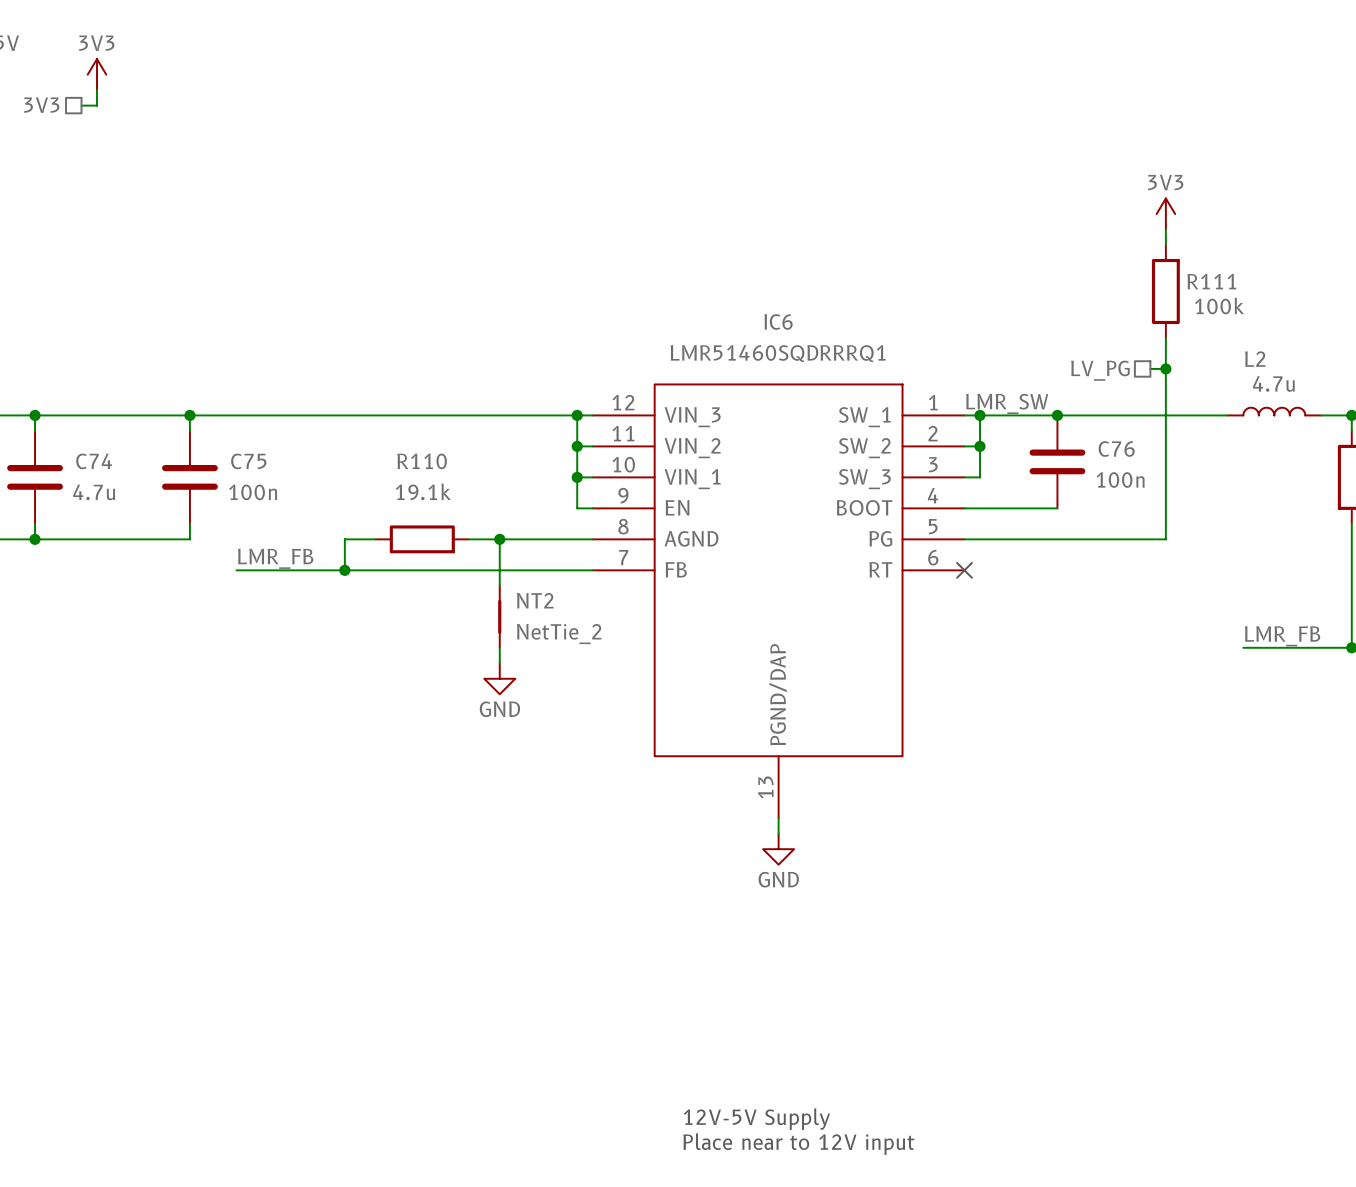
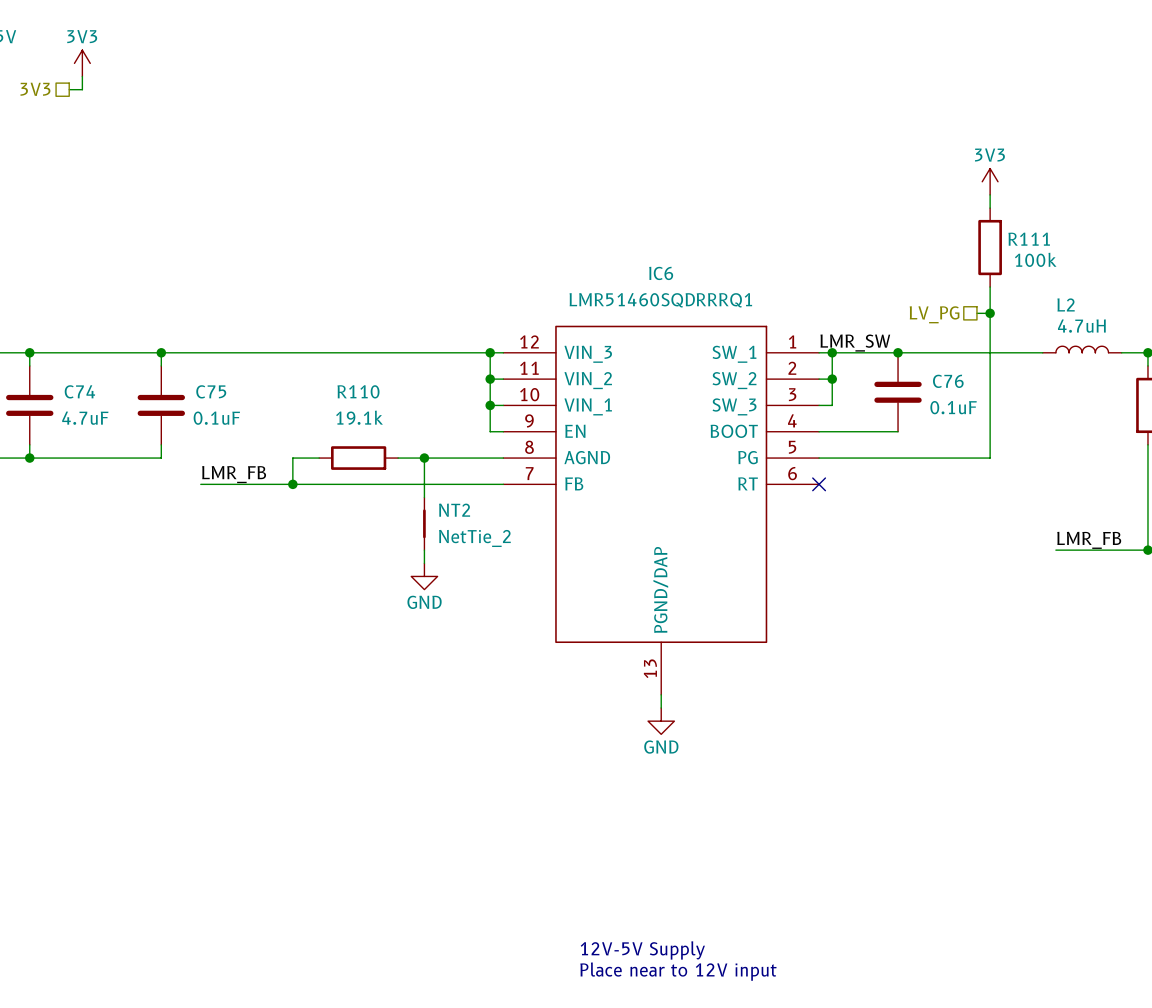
L2 value: 4.7u (1273, 383) -> 4.7uH (1081, 326)
C76 value: 100n (1120, 479) -> 0.1uF (953, 407)
C74 value: 4.7u (94, 492) -> 4.7uF (85, 418)
C75 value: 100n (253, 492) -> 0.1uF (216, 418)

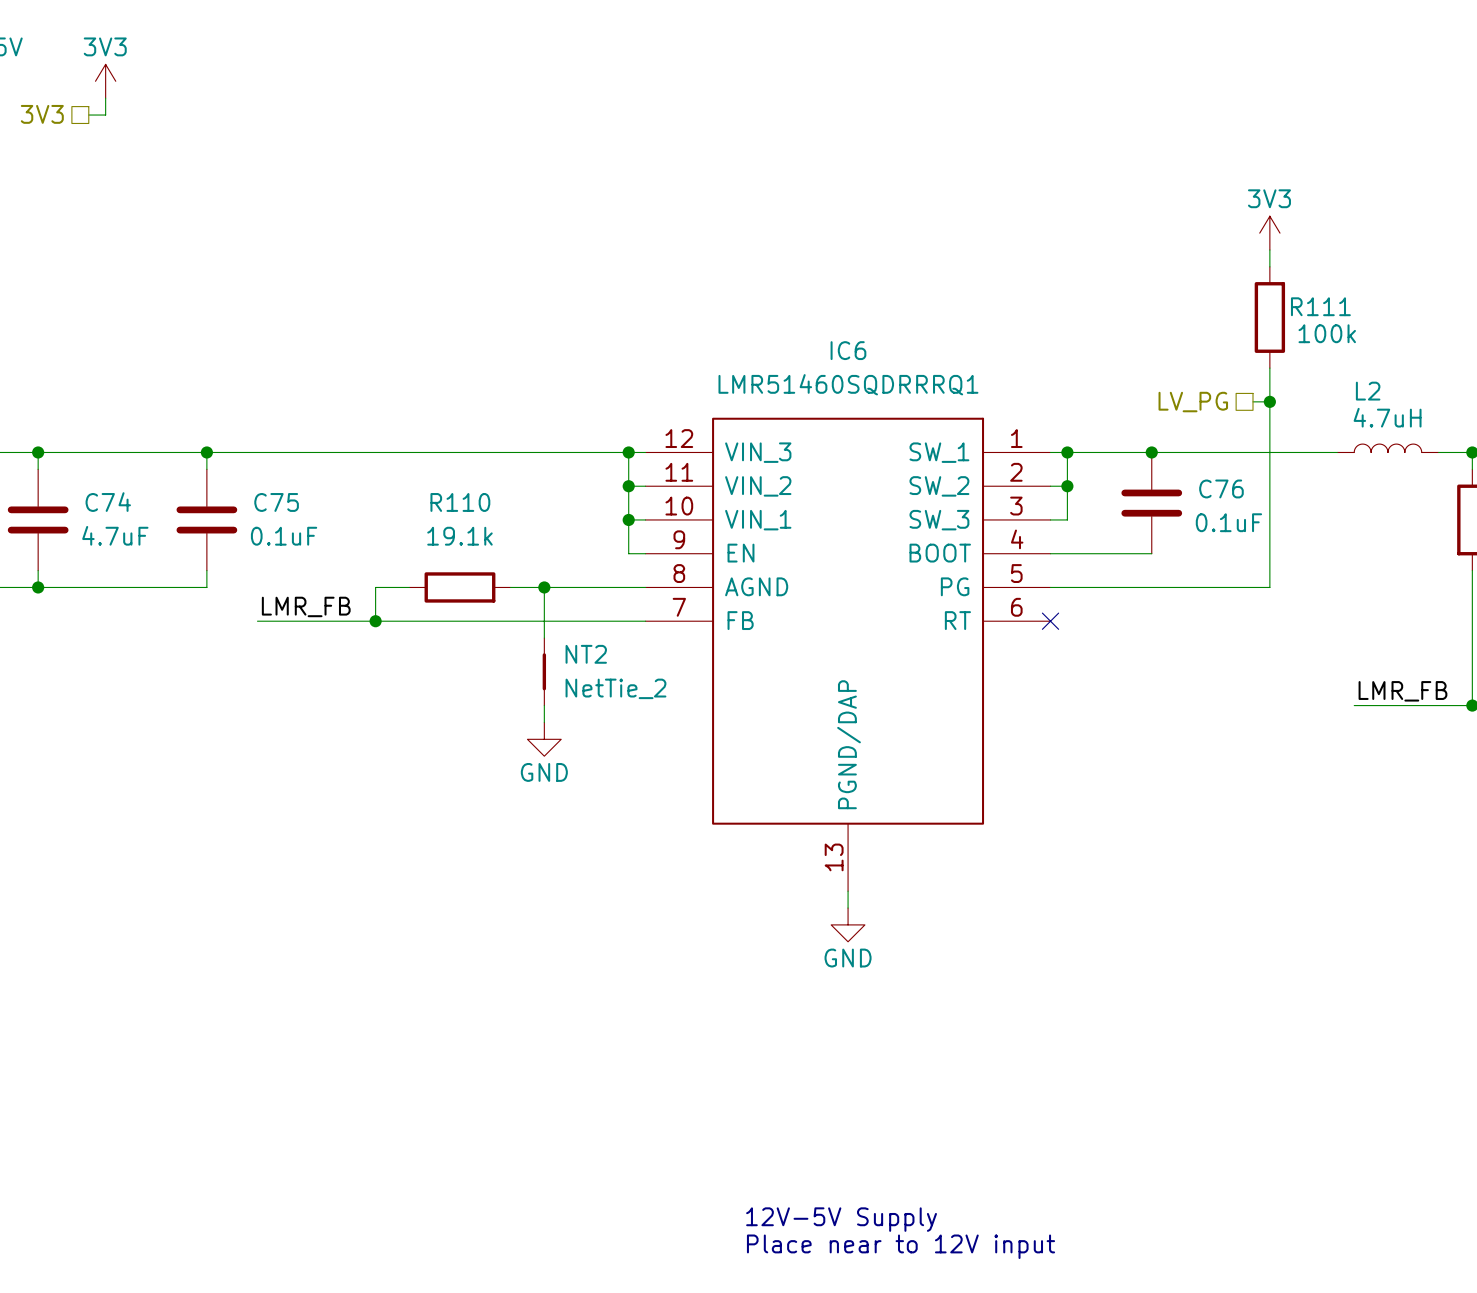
label: LMR_SW (855, 343) -> none

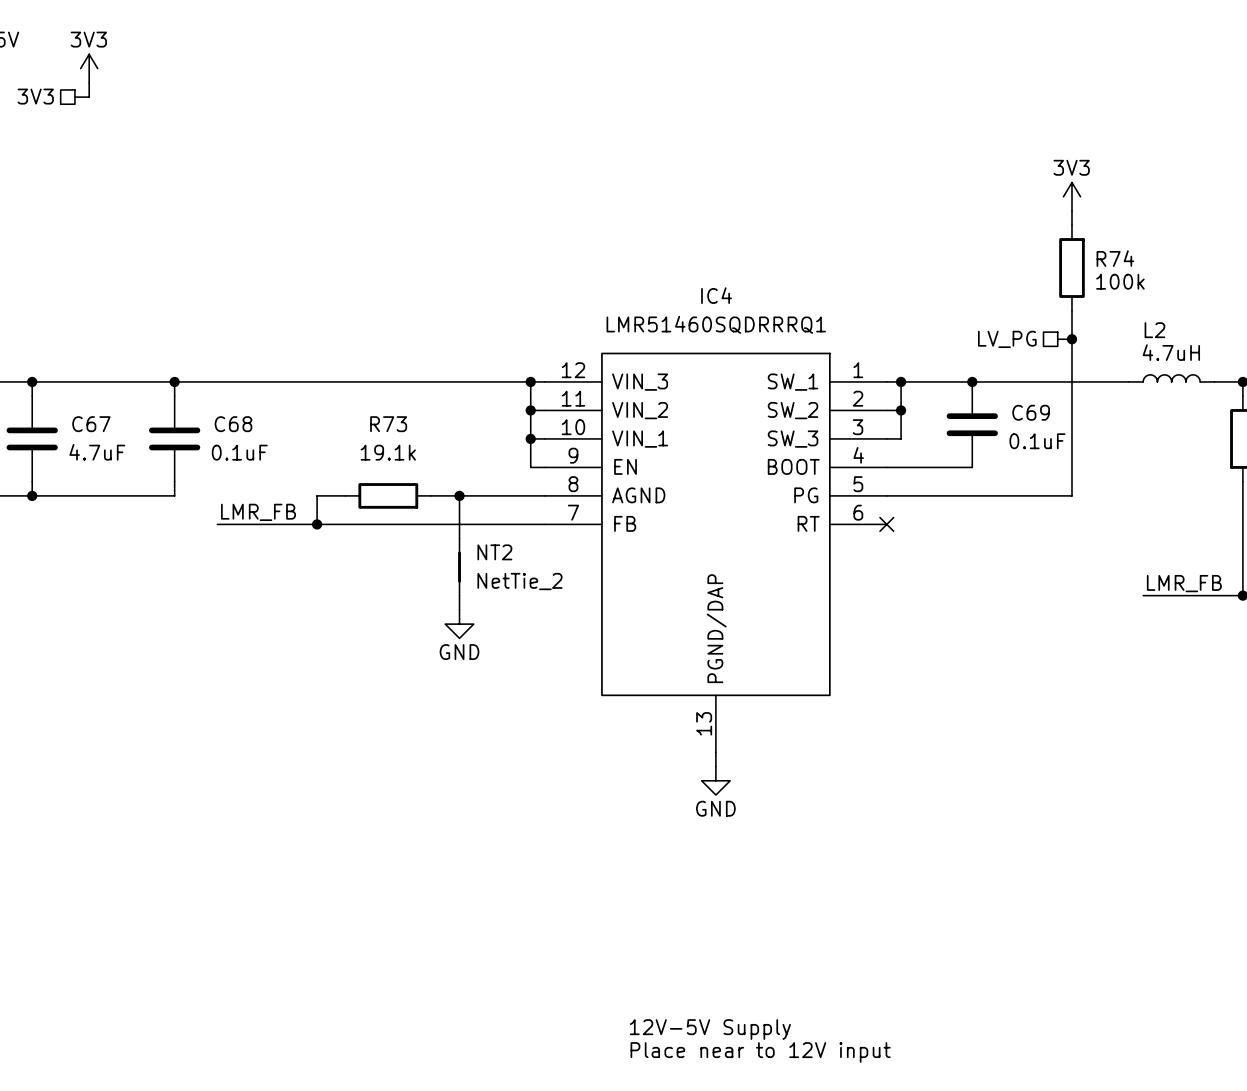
R111 name: R111 (1320, 306) -> R74 (1115, 258)
IC6 name: IC6 (848, 350) -> IC4 (716, 295)
C76 name: C76 (1221, 488) -> C69 (1031, 412)
C74 name: C74 (108, 502) -> C67 (91, 424)
C75 name: C75 (276, 502) -> C68 (233, 424)
R110 name: R110 (460, 502) -> R73 (388, 424)

